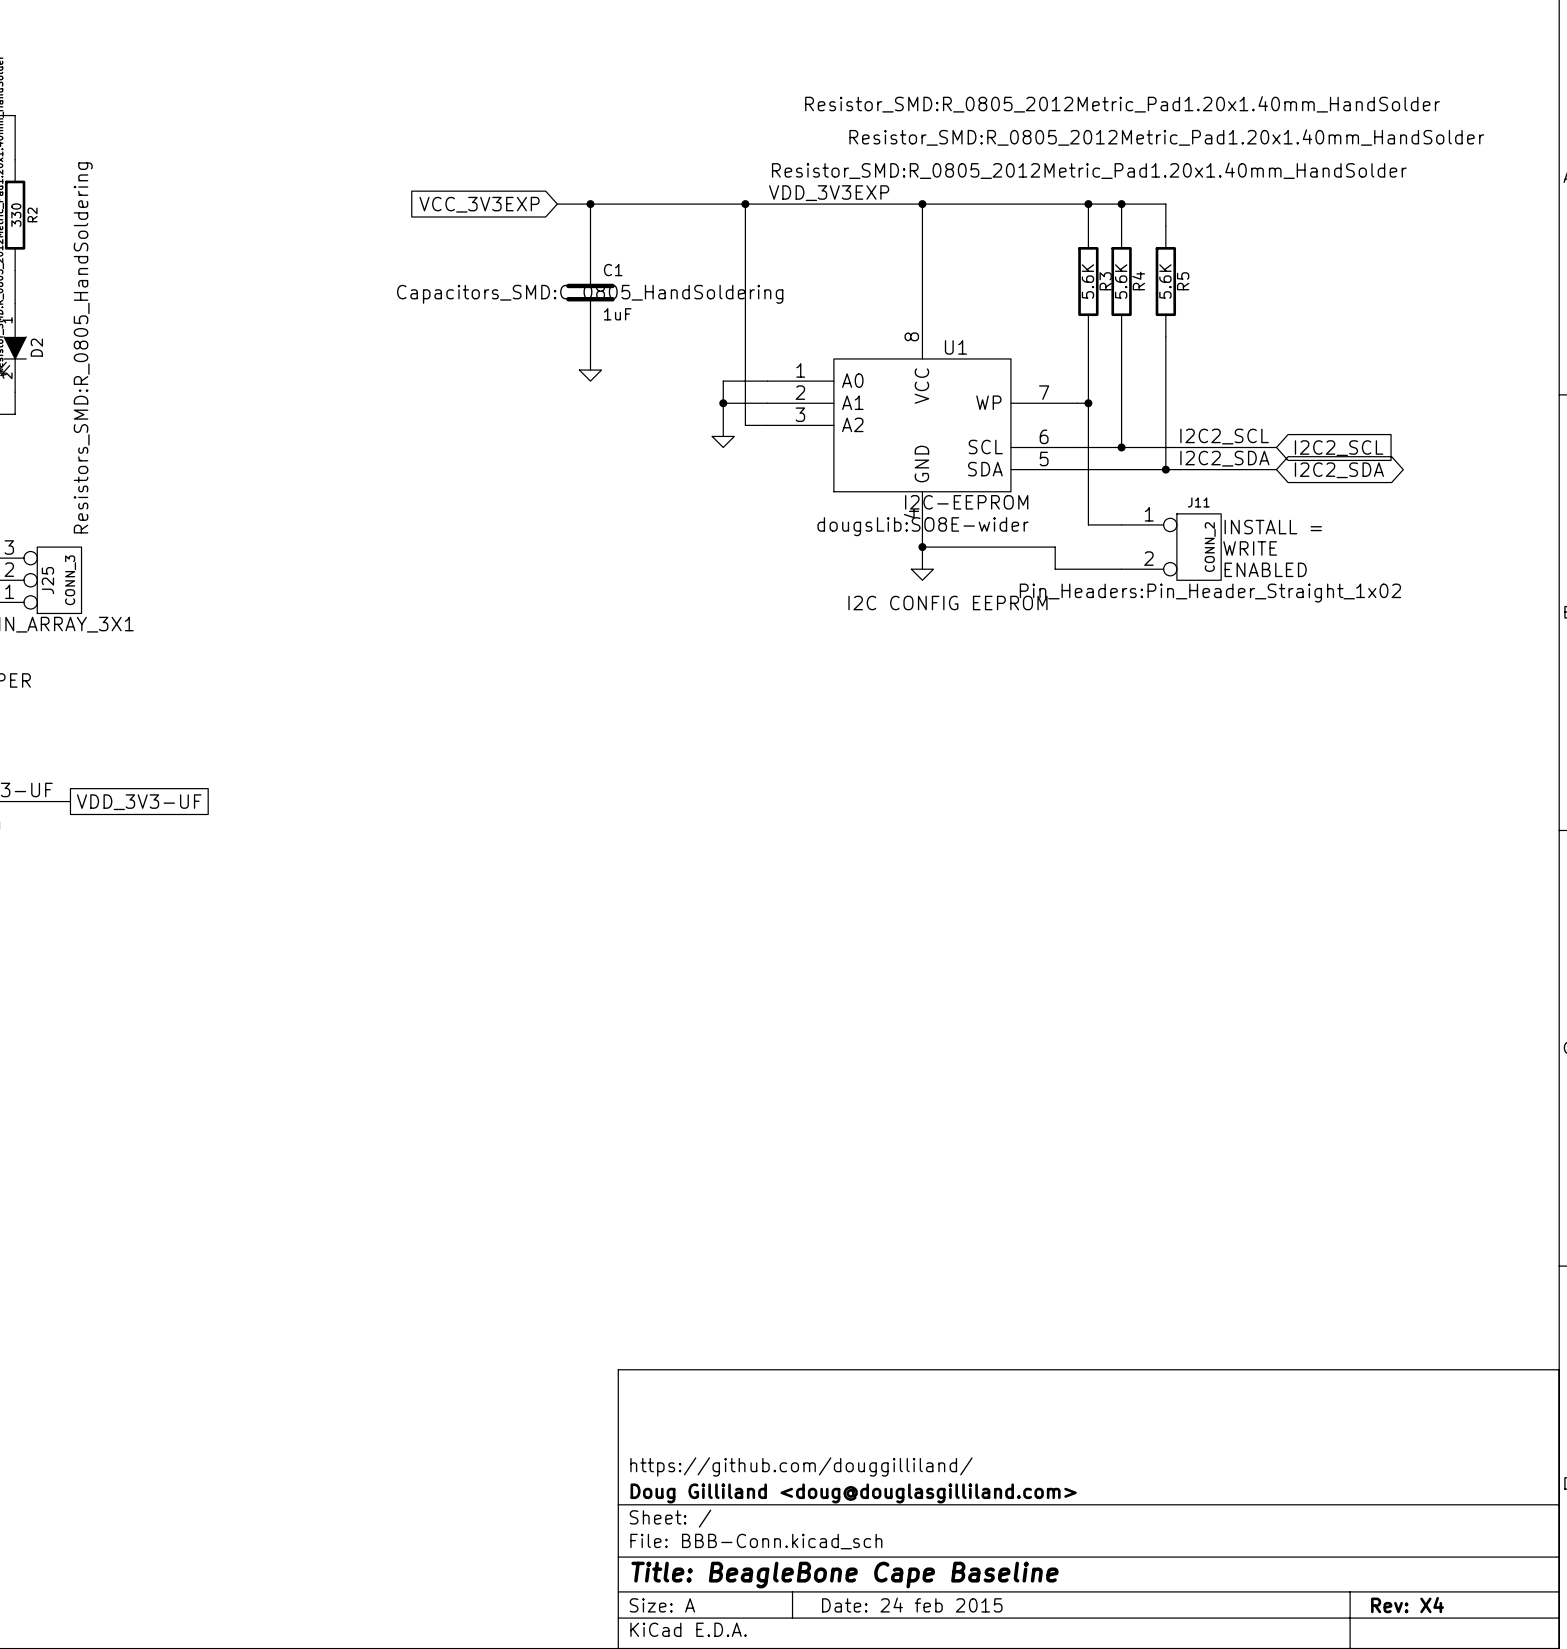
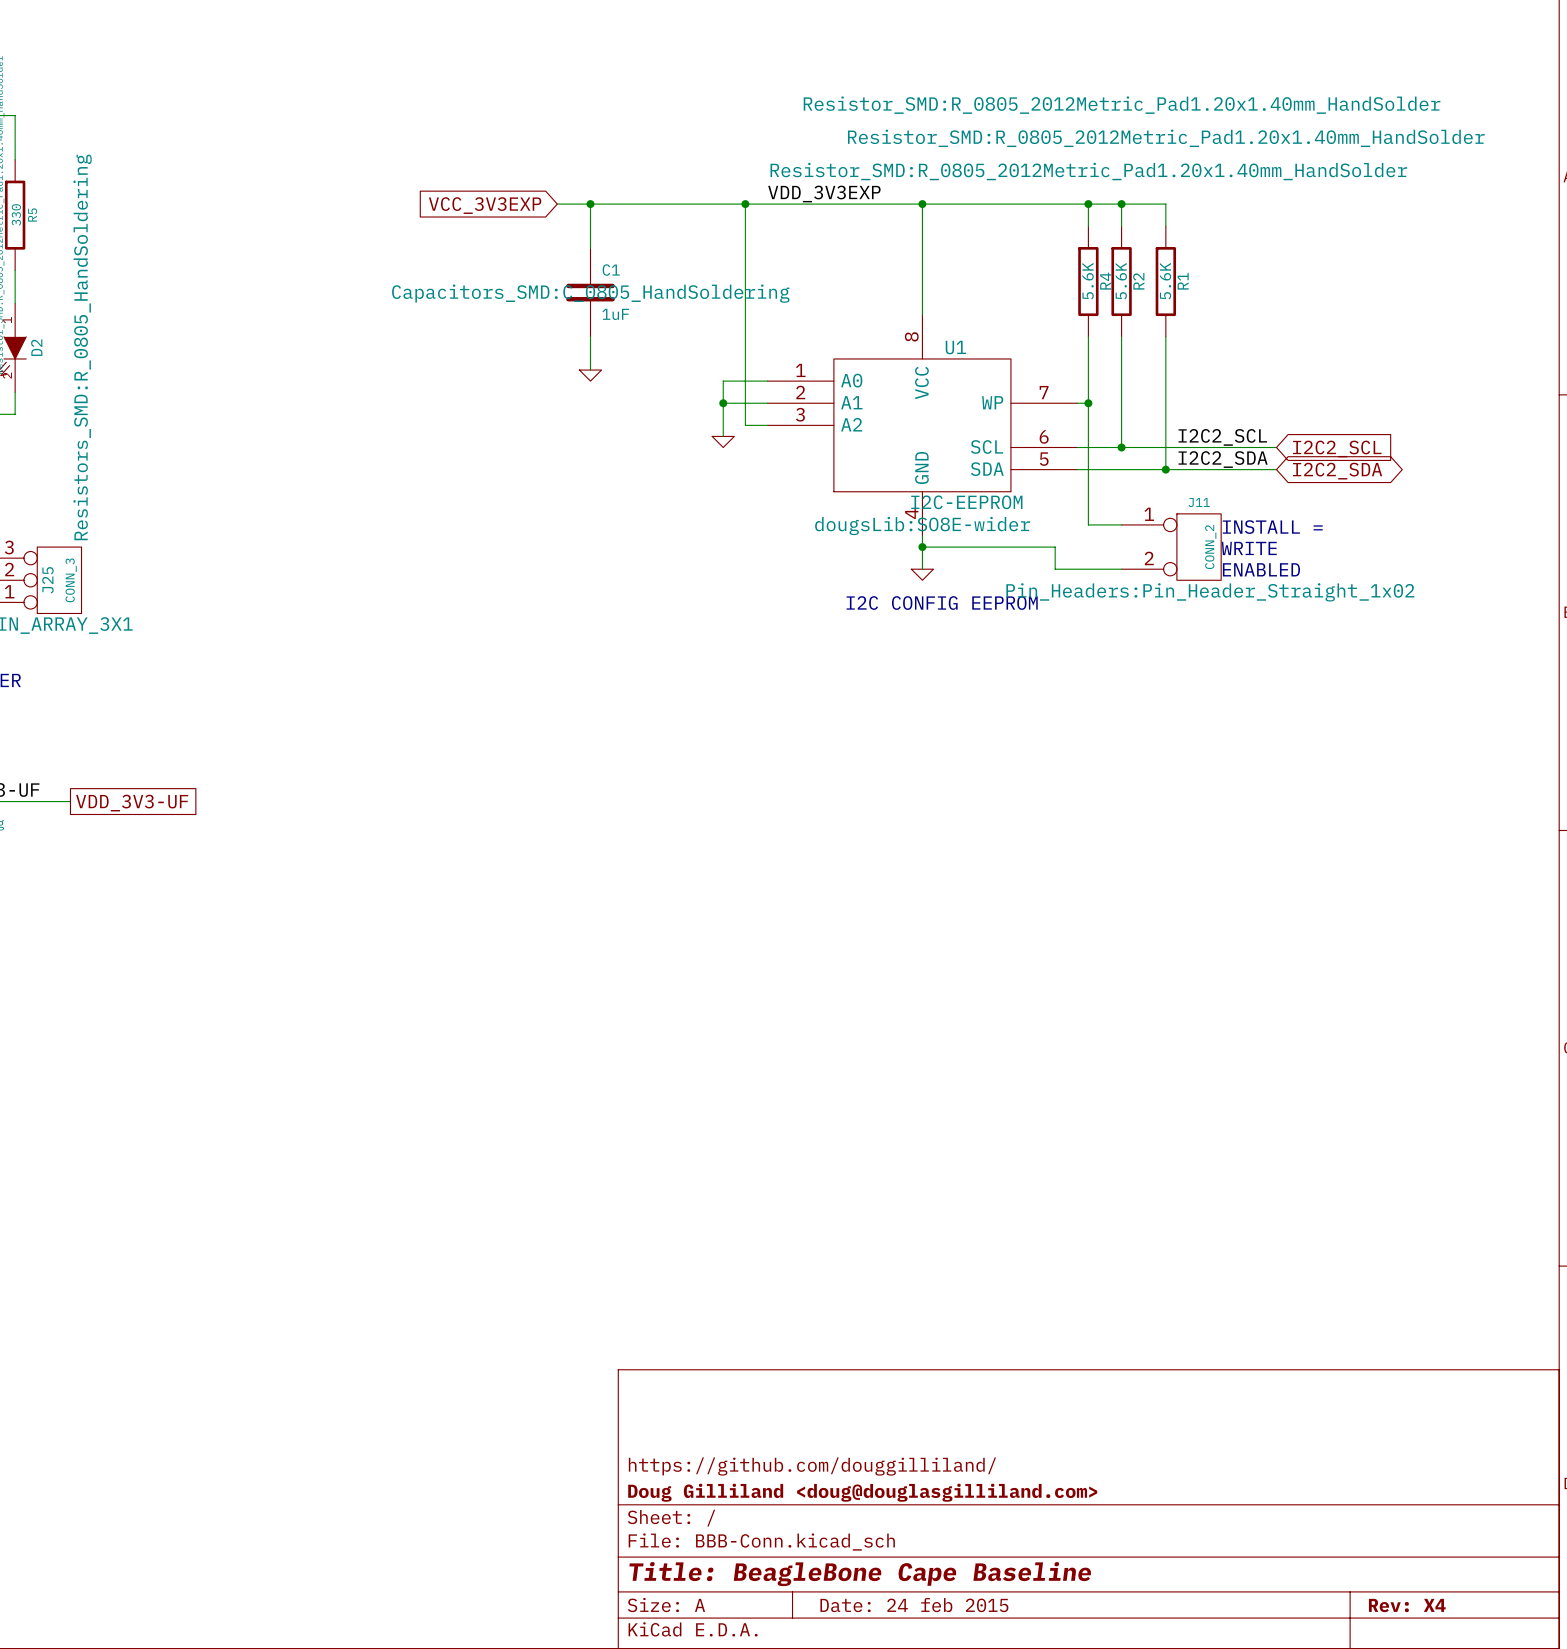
R2 name: R2 (32, 214) -> R5 (32, 215)
R3 name: R3 (1105, 281) -> R4 (1105, 281)
R4 name: R4 (1138, 281) -> R2 (1138, 281)
R5 name: R5 (1183, 281) -> R1 (1183, 281)

